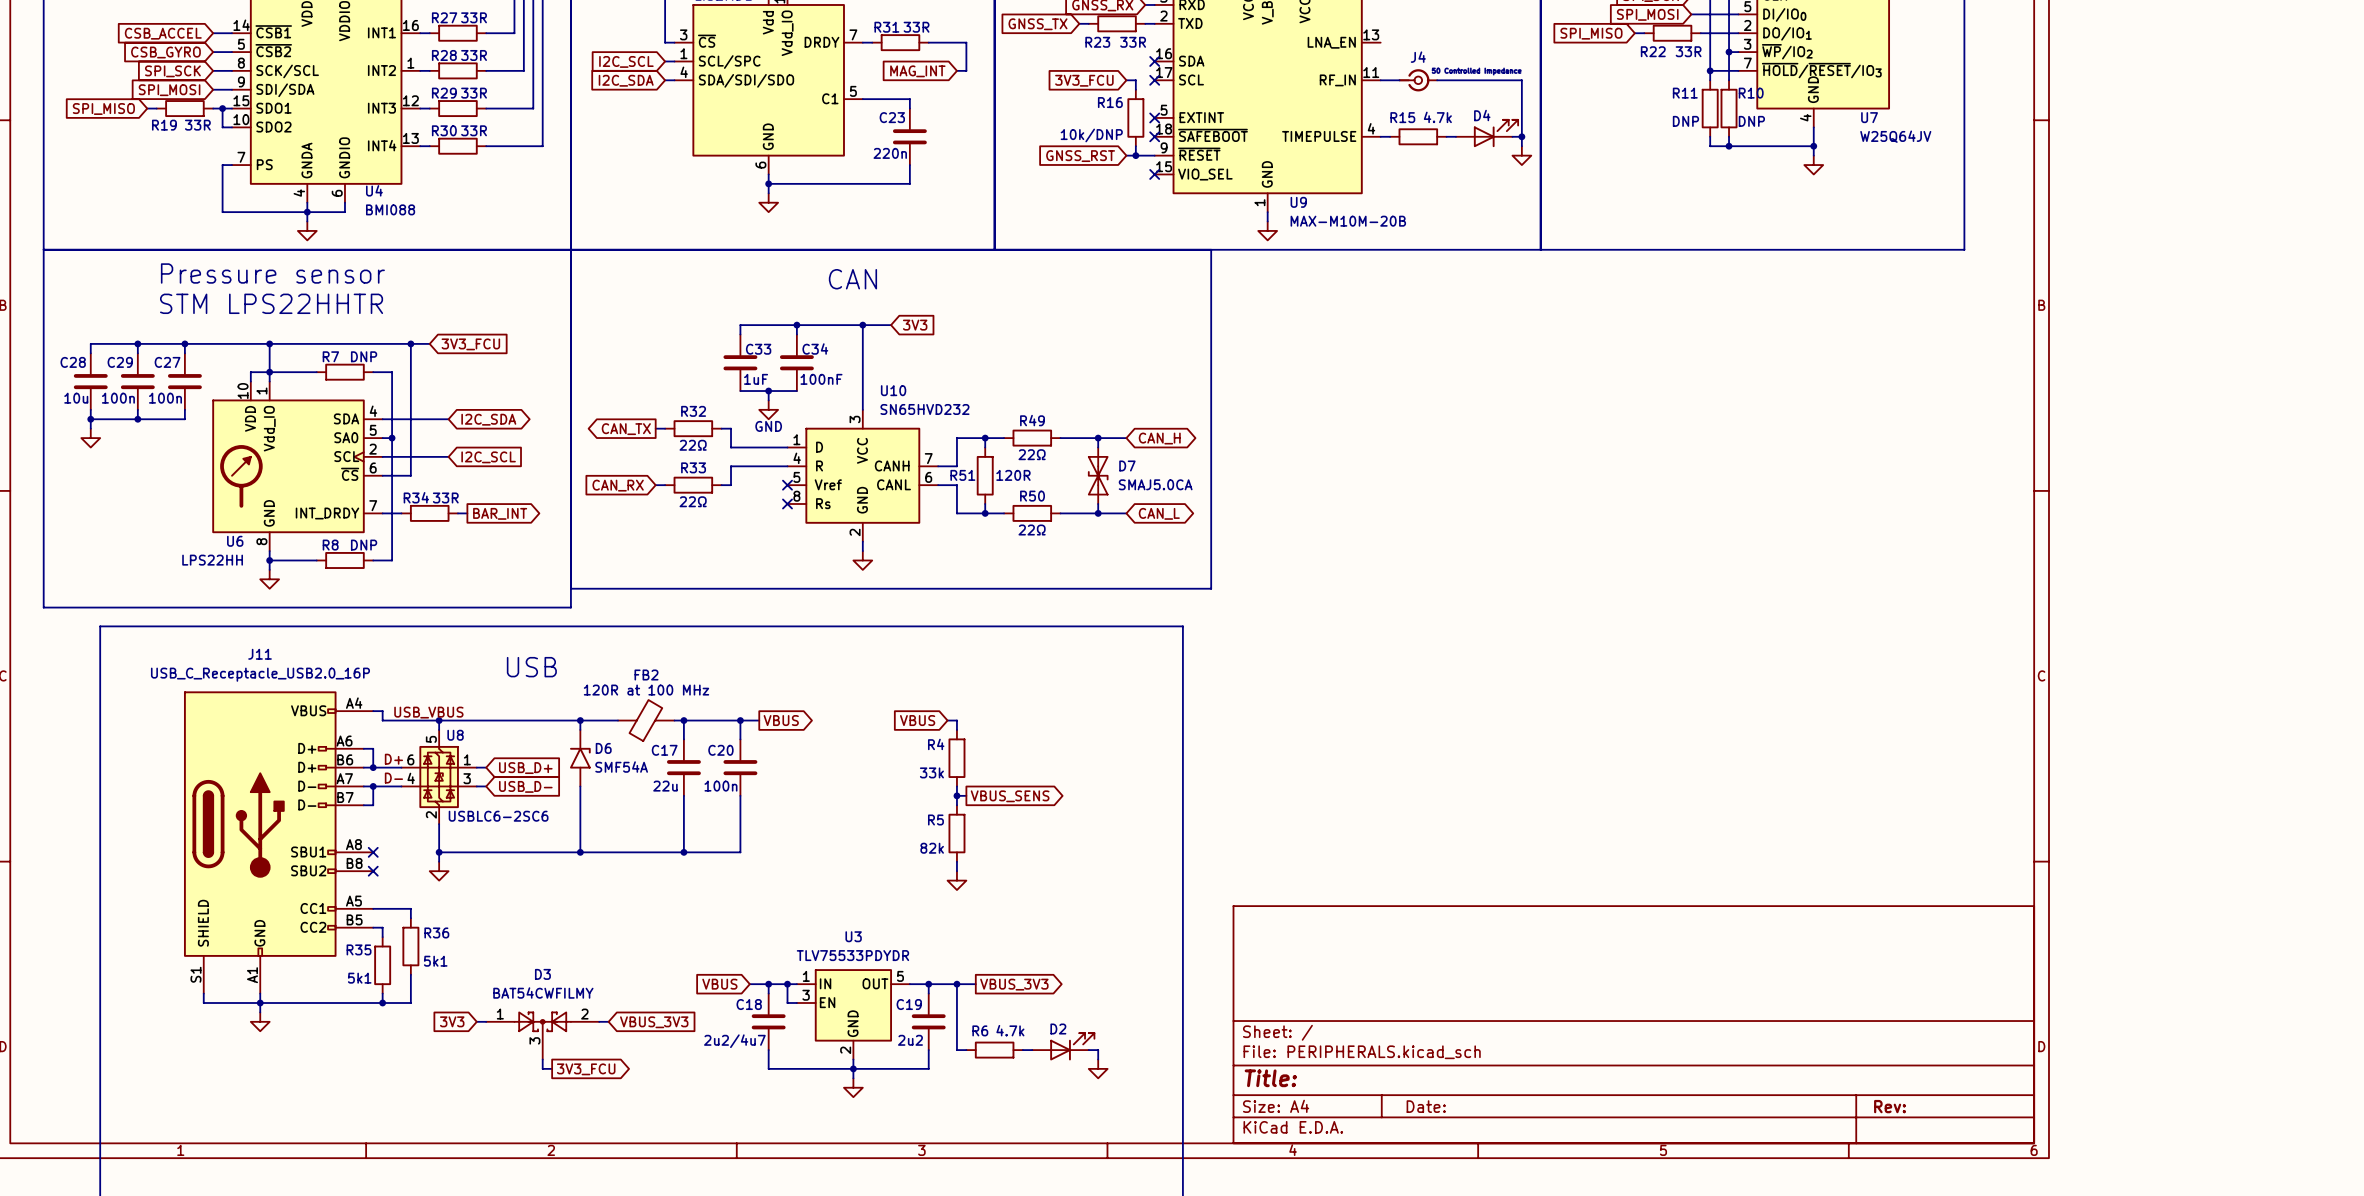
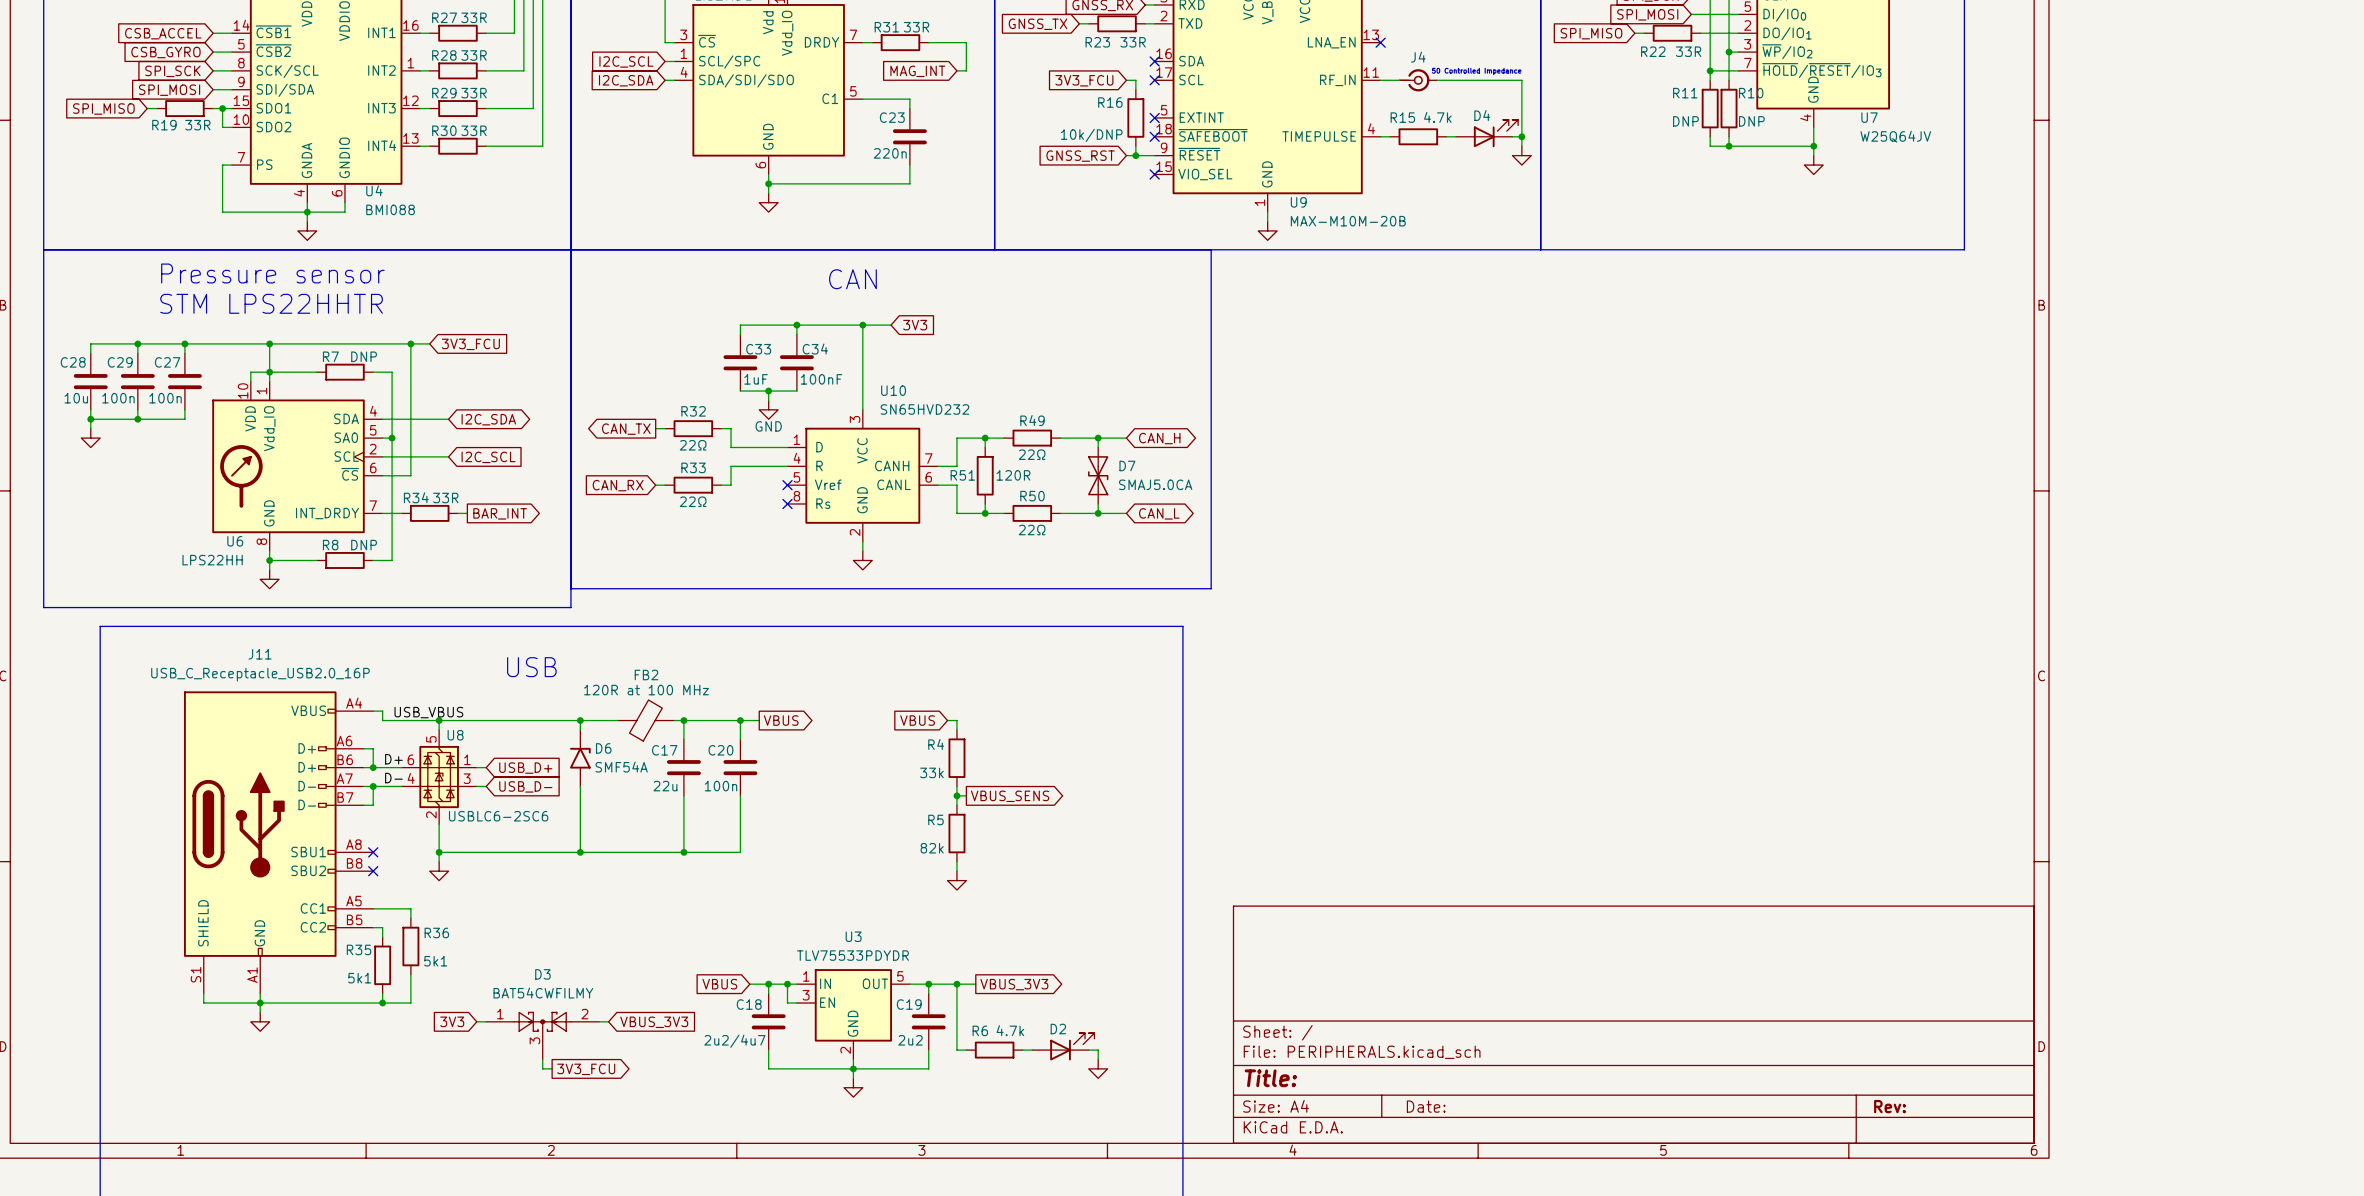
no-connect mark: none -> (1380, 42)

